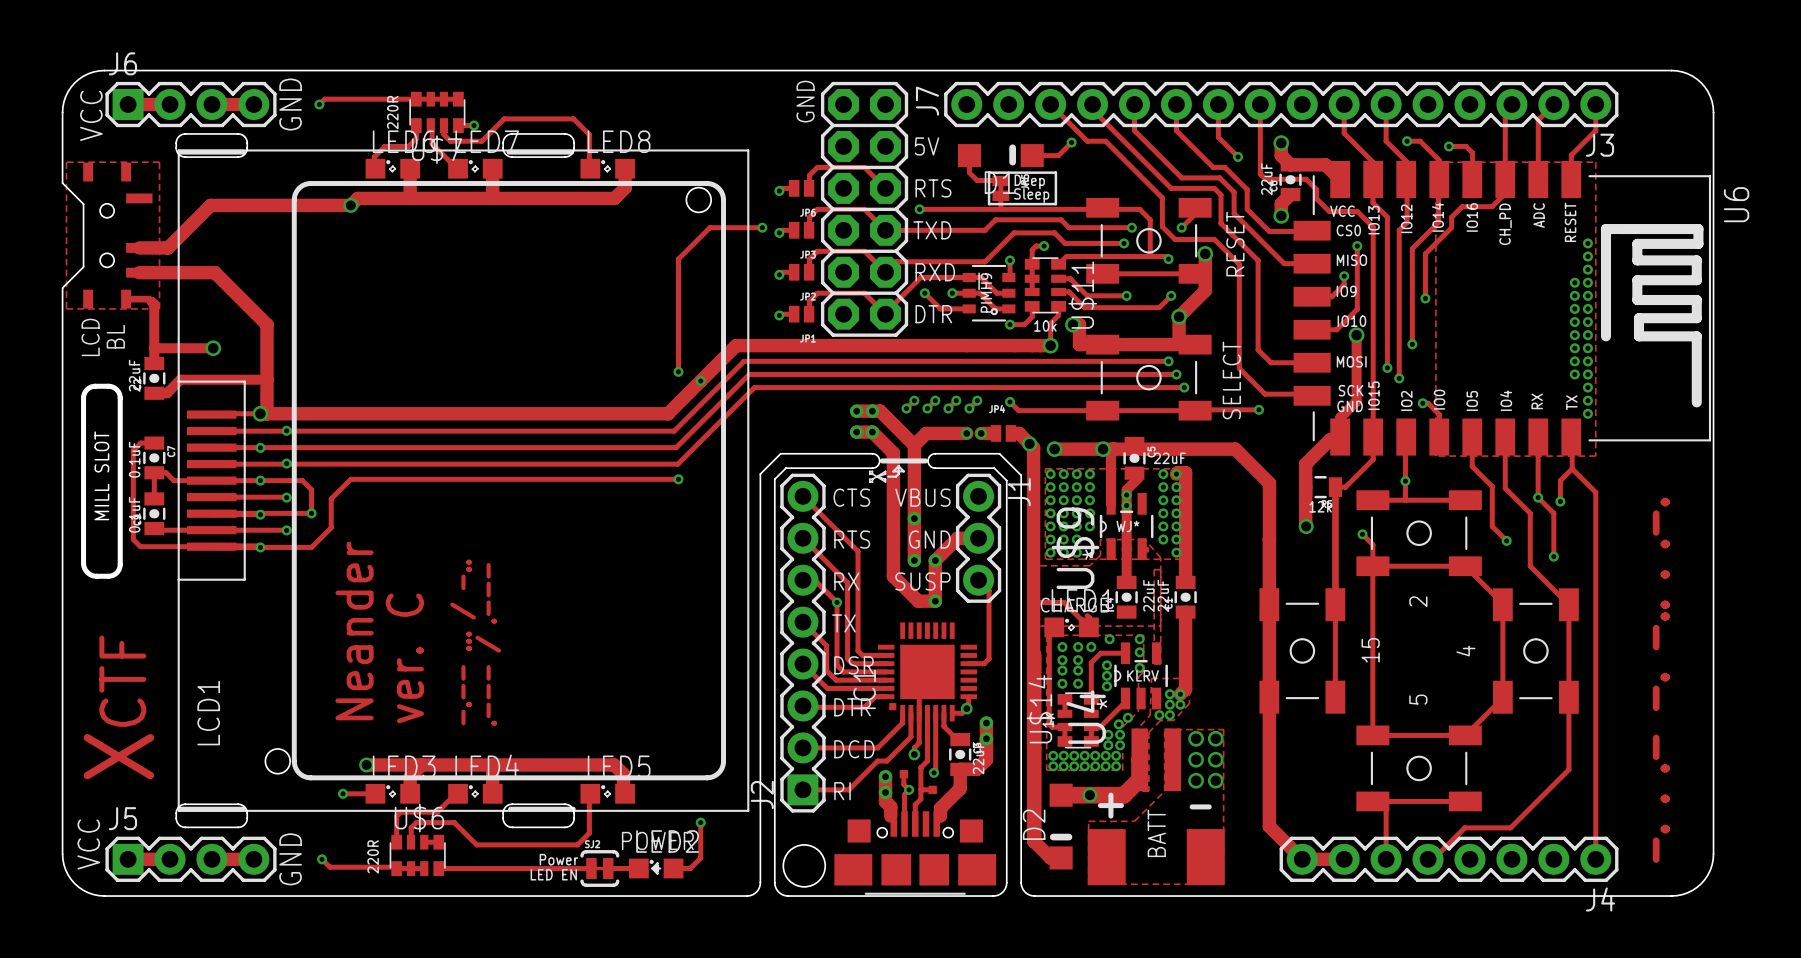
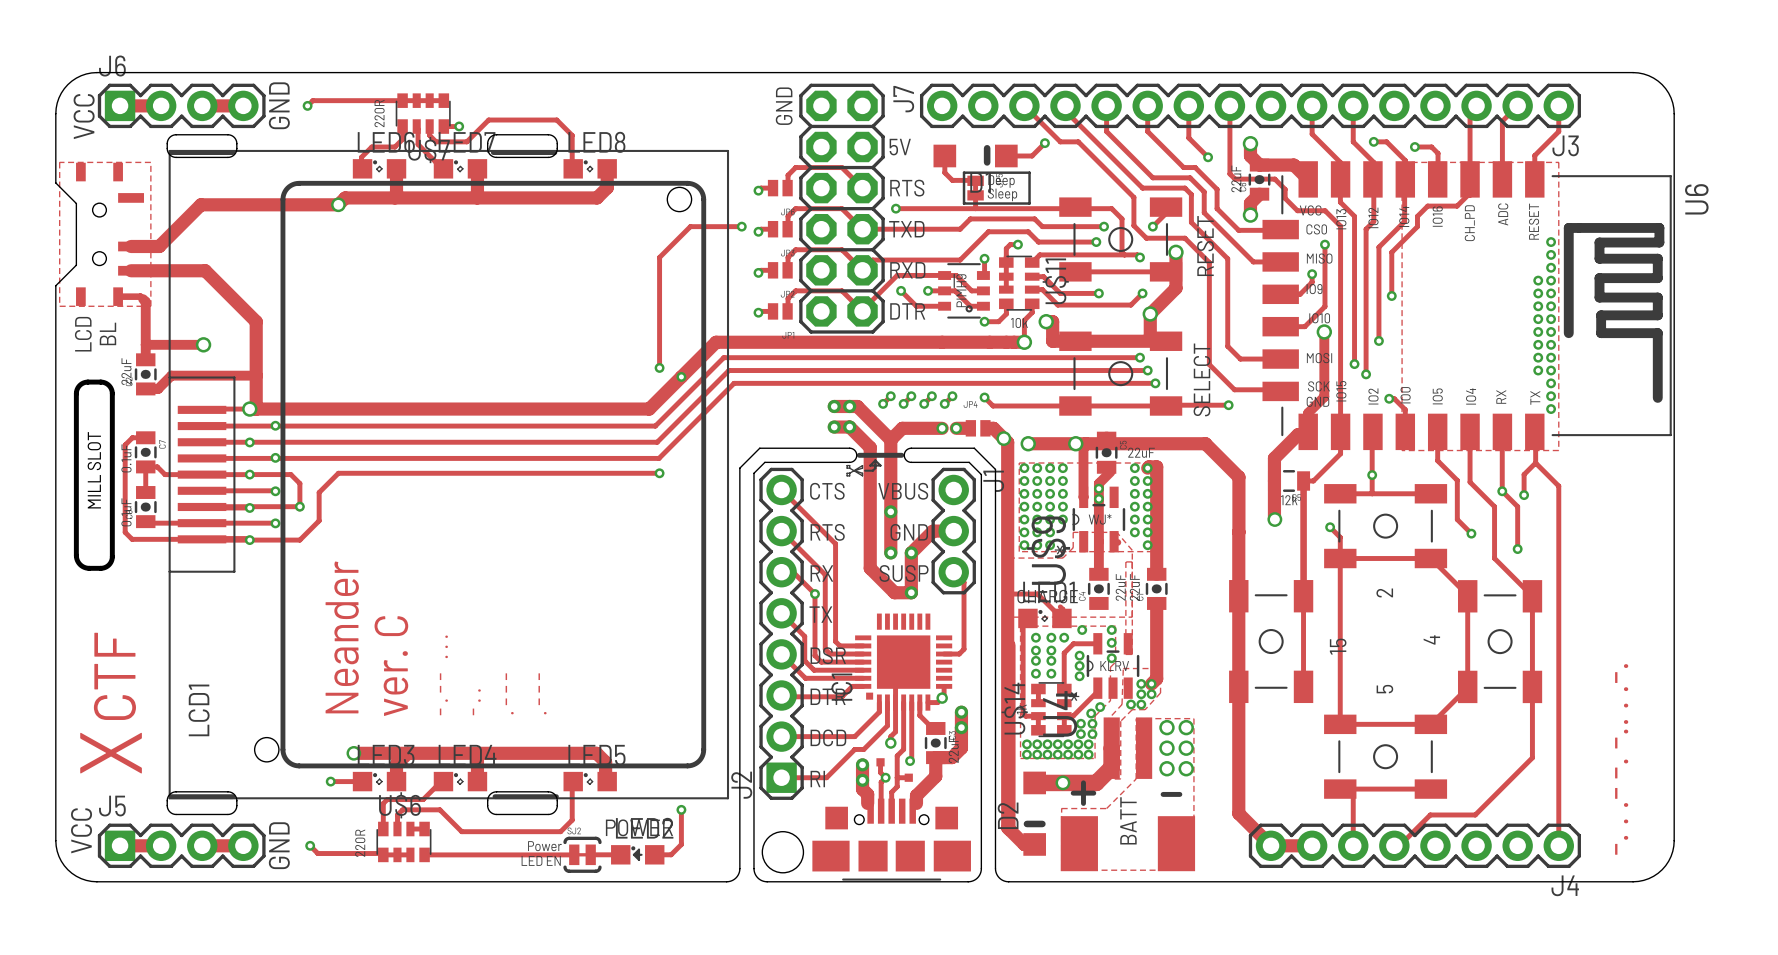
text: -.-- ... / -.. (463, 642) -> - . - - . . . (443, 675)
text: .--- / .--- (488, 644) -> - . . (476, 702)
text: none -> . - - - (509, 693)
text: none -> . - - - (542, 693)

